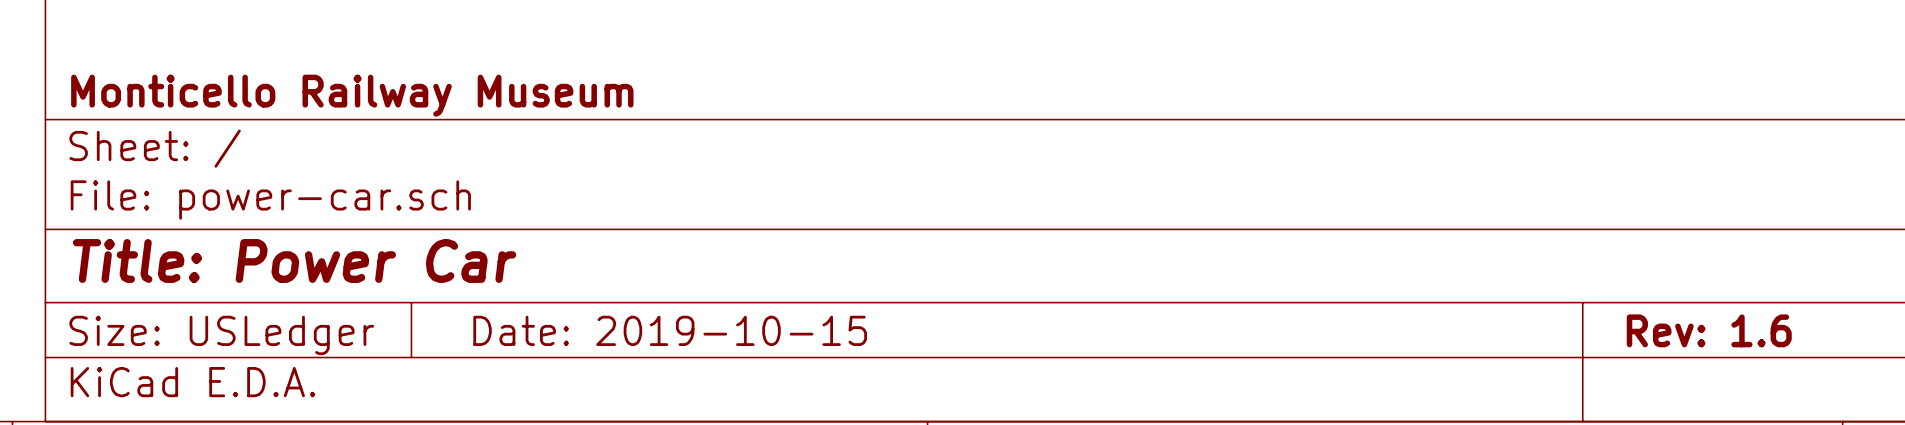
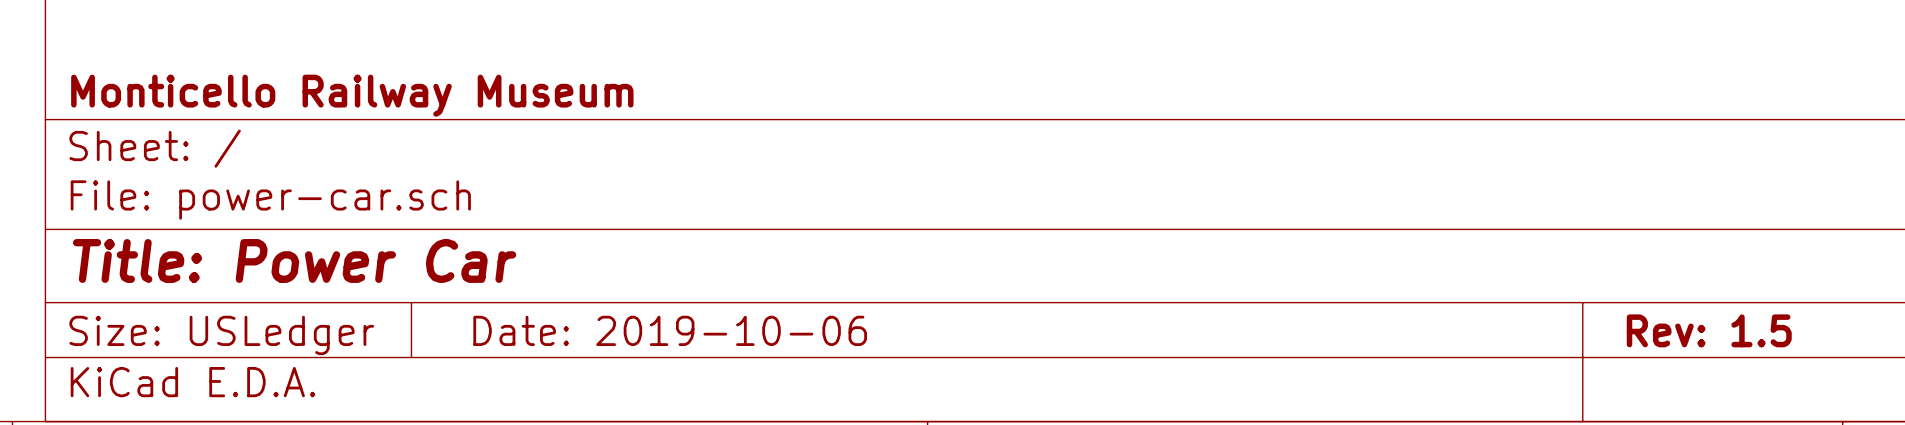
title block: Date: 2019-10-15 (670, 330) -> Date: 2019-10-06 (670, 330)
title block: Rev: 1.6 (1709, 330) -> Rev: 1.5 (1709, 330)

